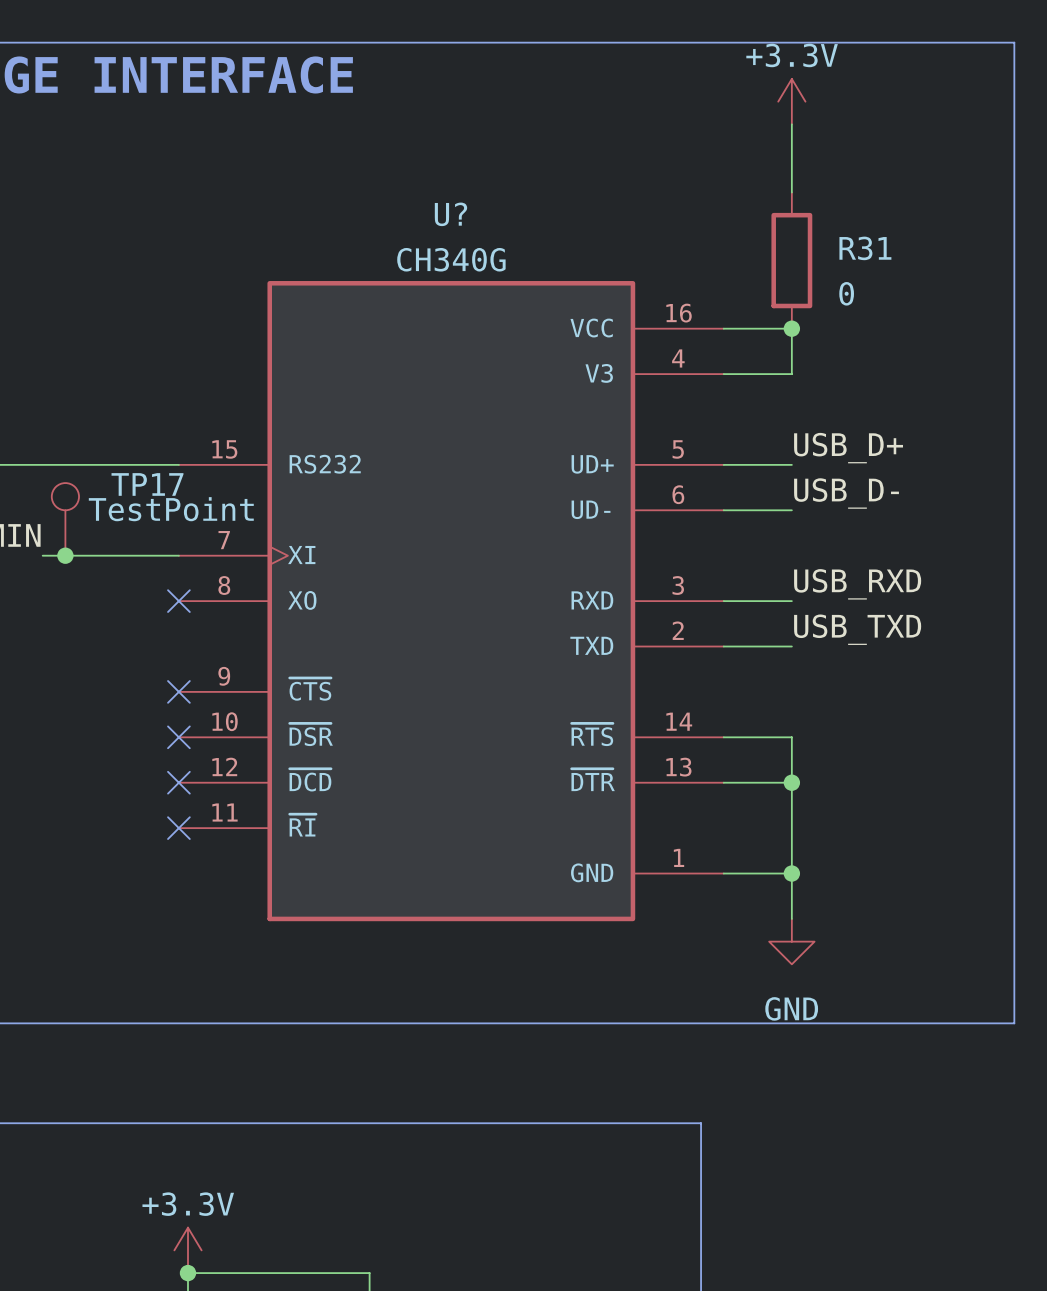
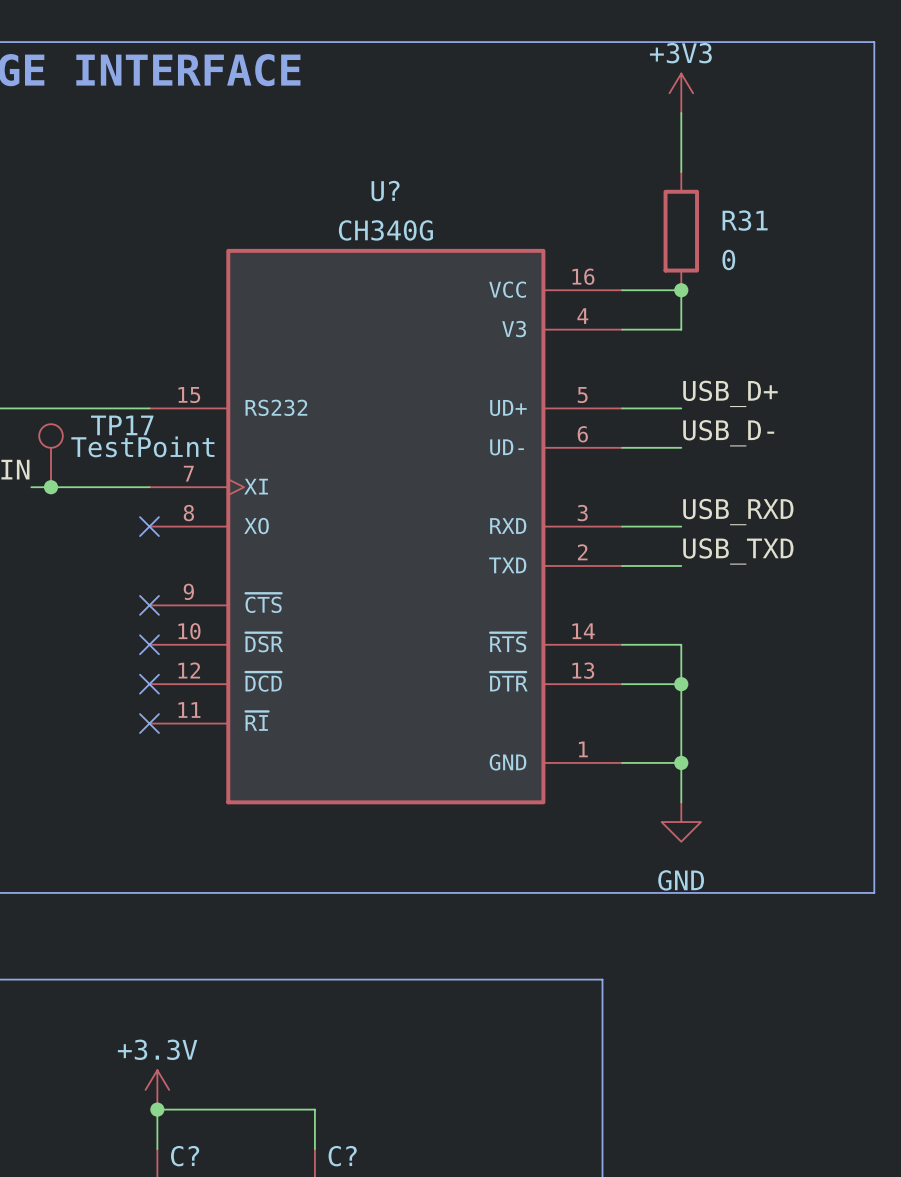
power symbol: +3.3V (791, 101) -> +3V3 (681, 93)

